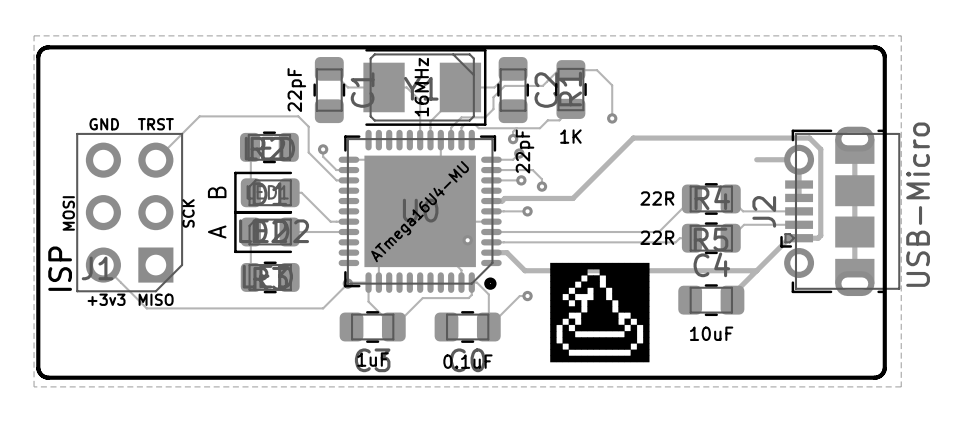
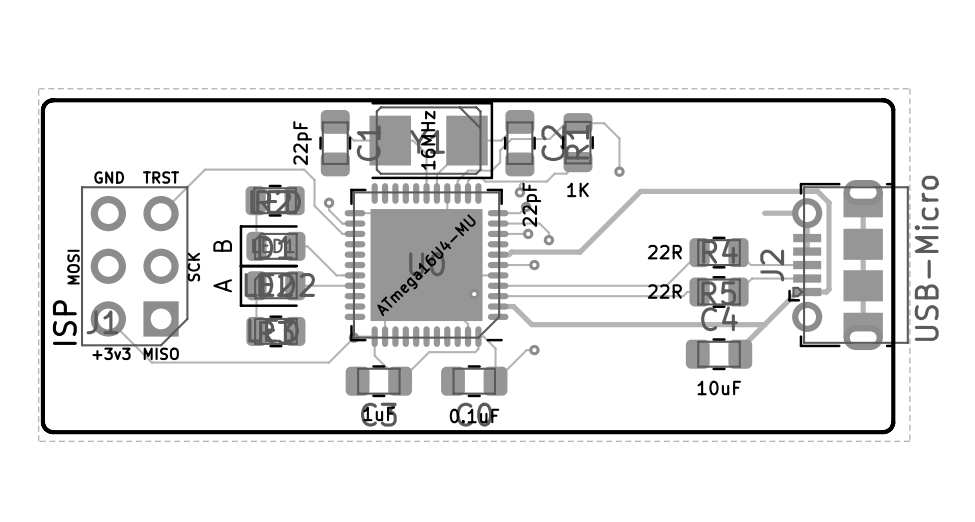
part footprint: [338, 129, 502, 293] -> [344, 183, 509, 347]
drawing: [550, 262, 650, 363] -> none

